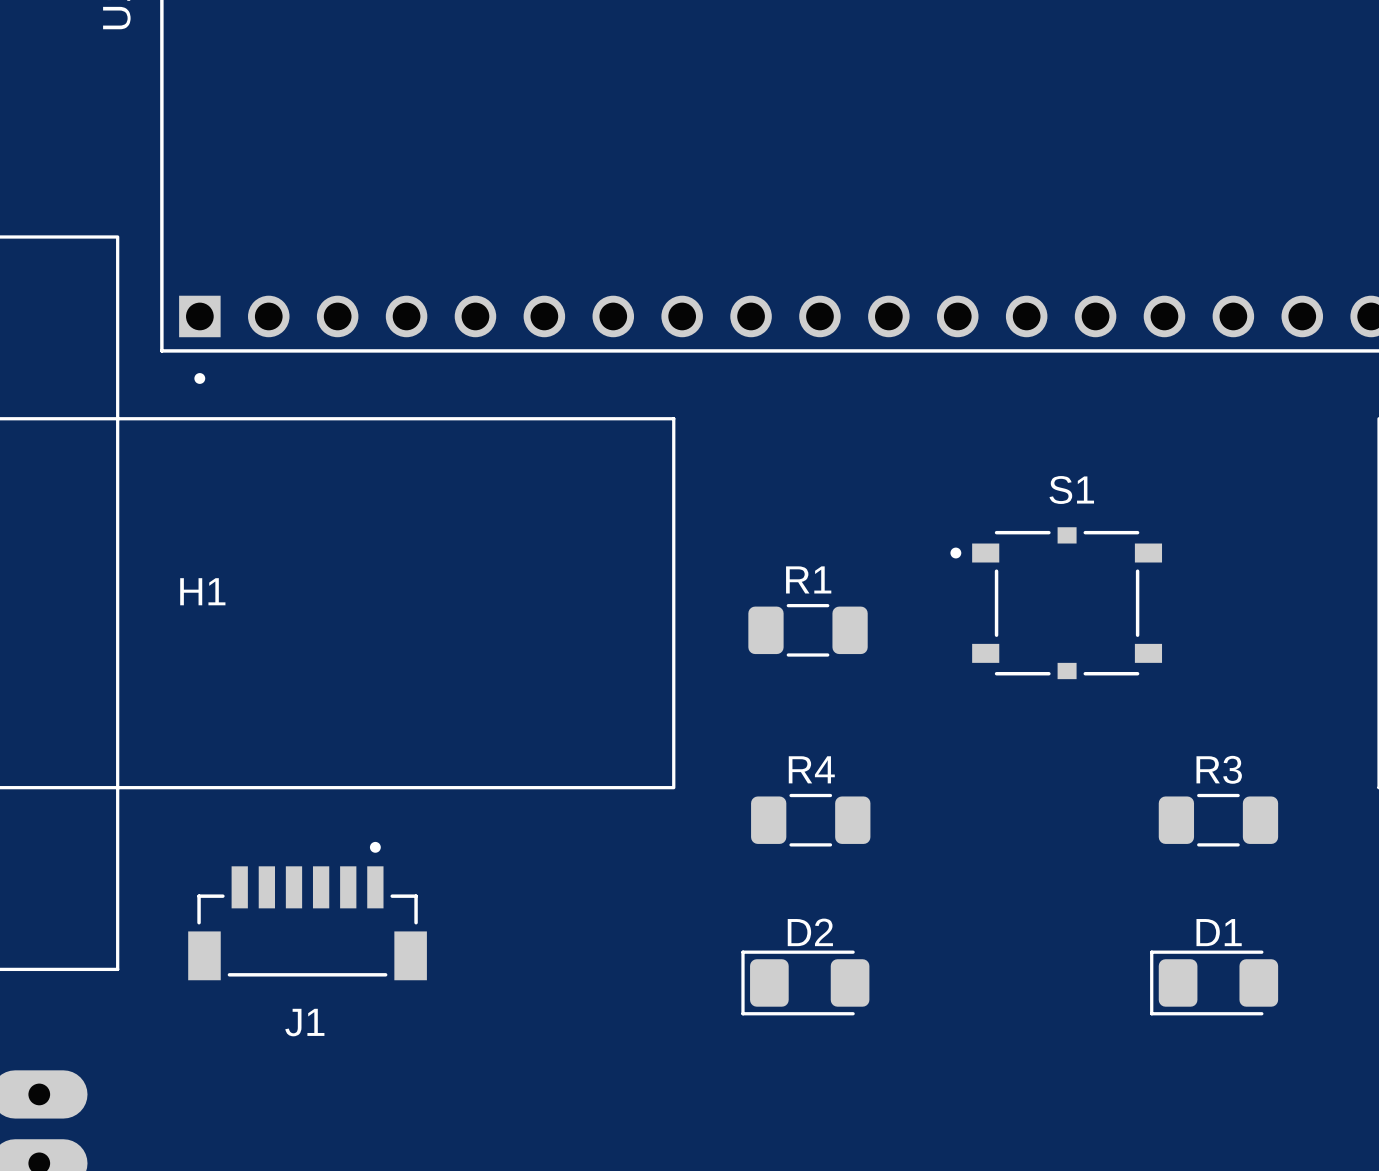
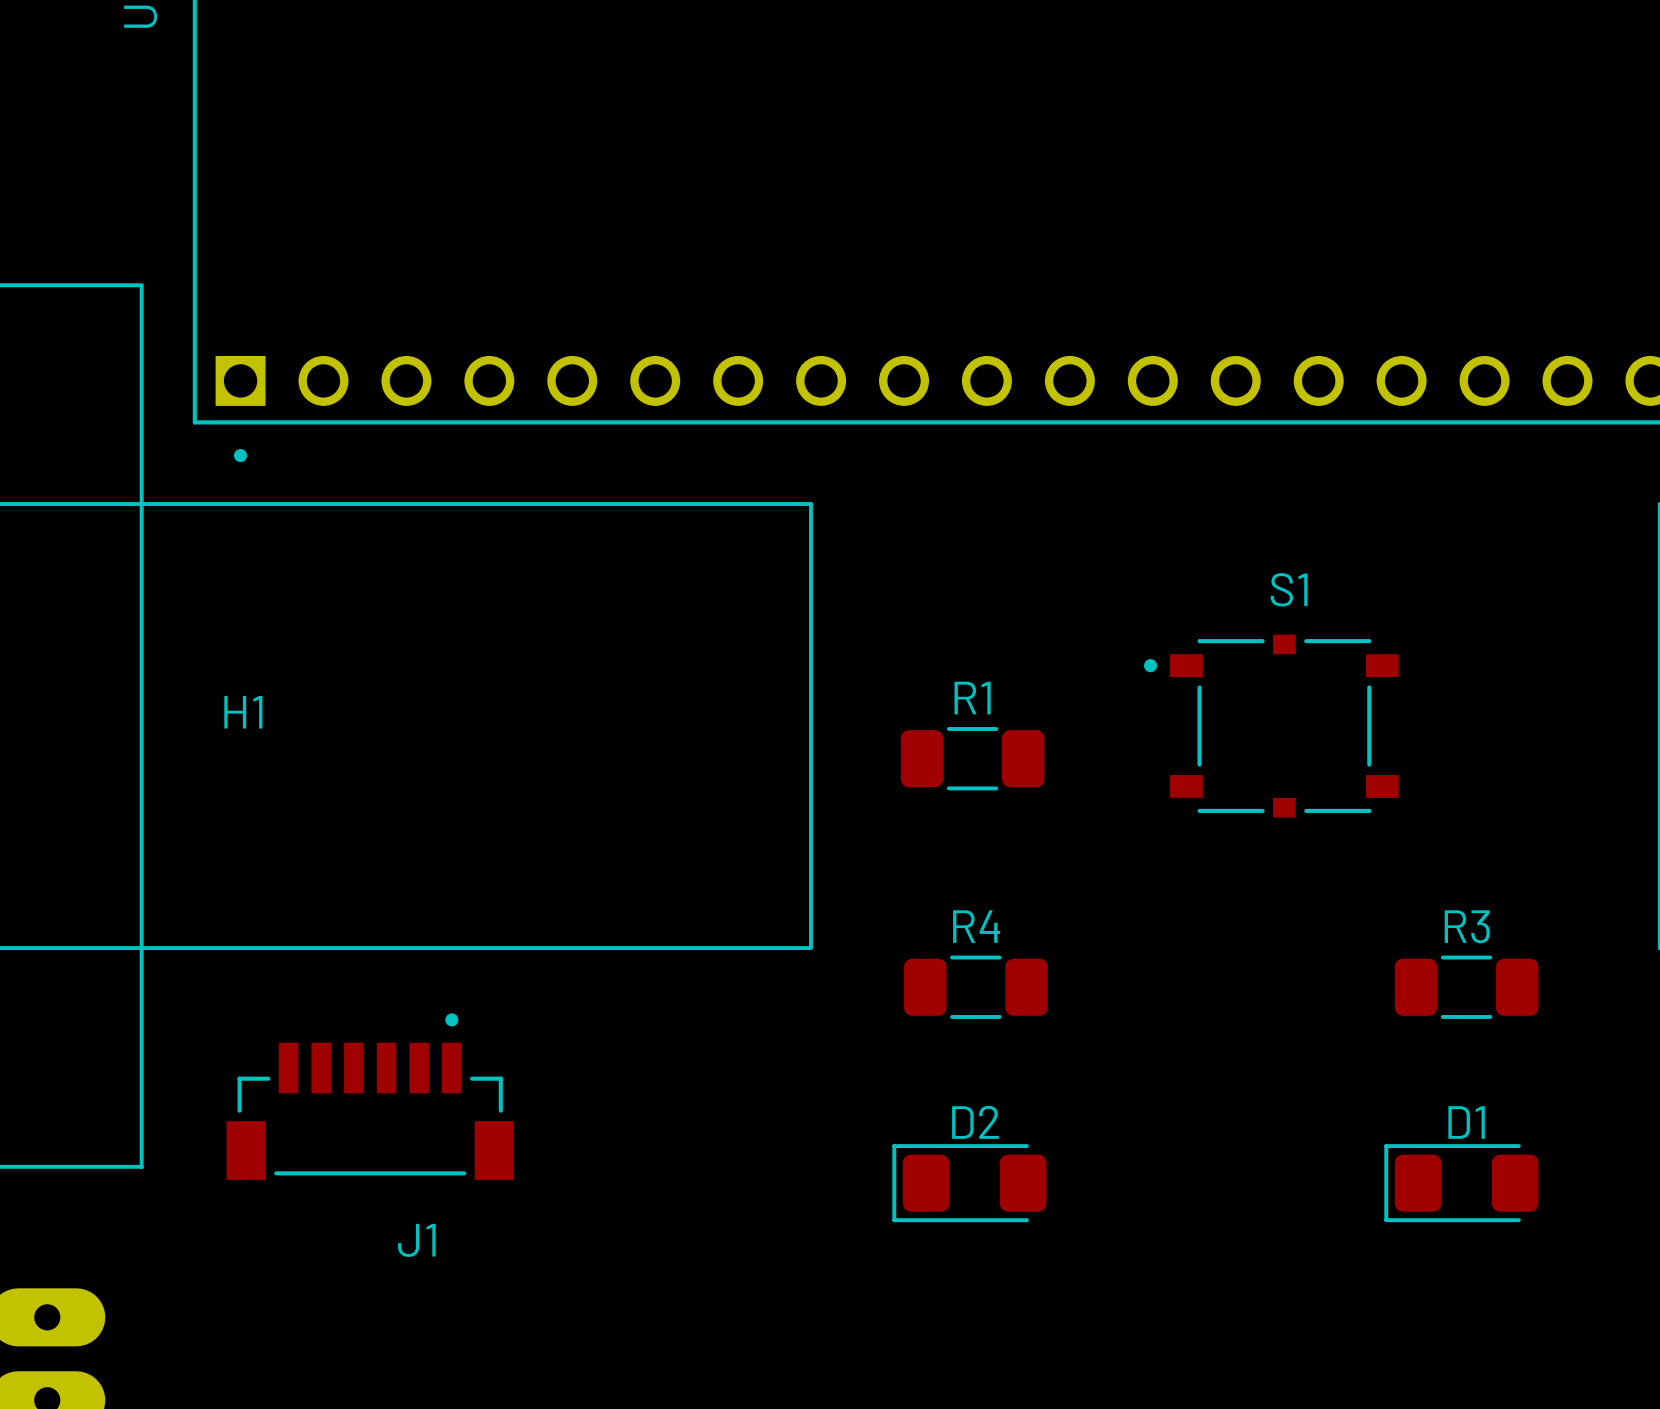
J1 name position: J1 (304, 1022) -> J1 (416, 1240)

